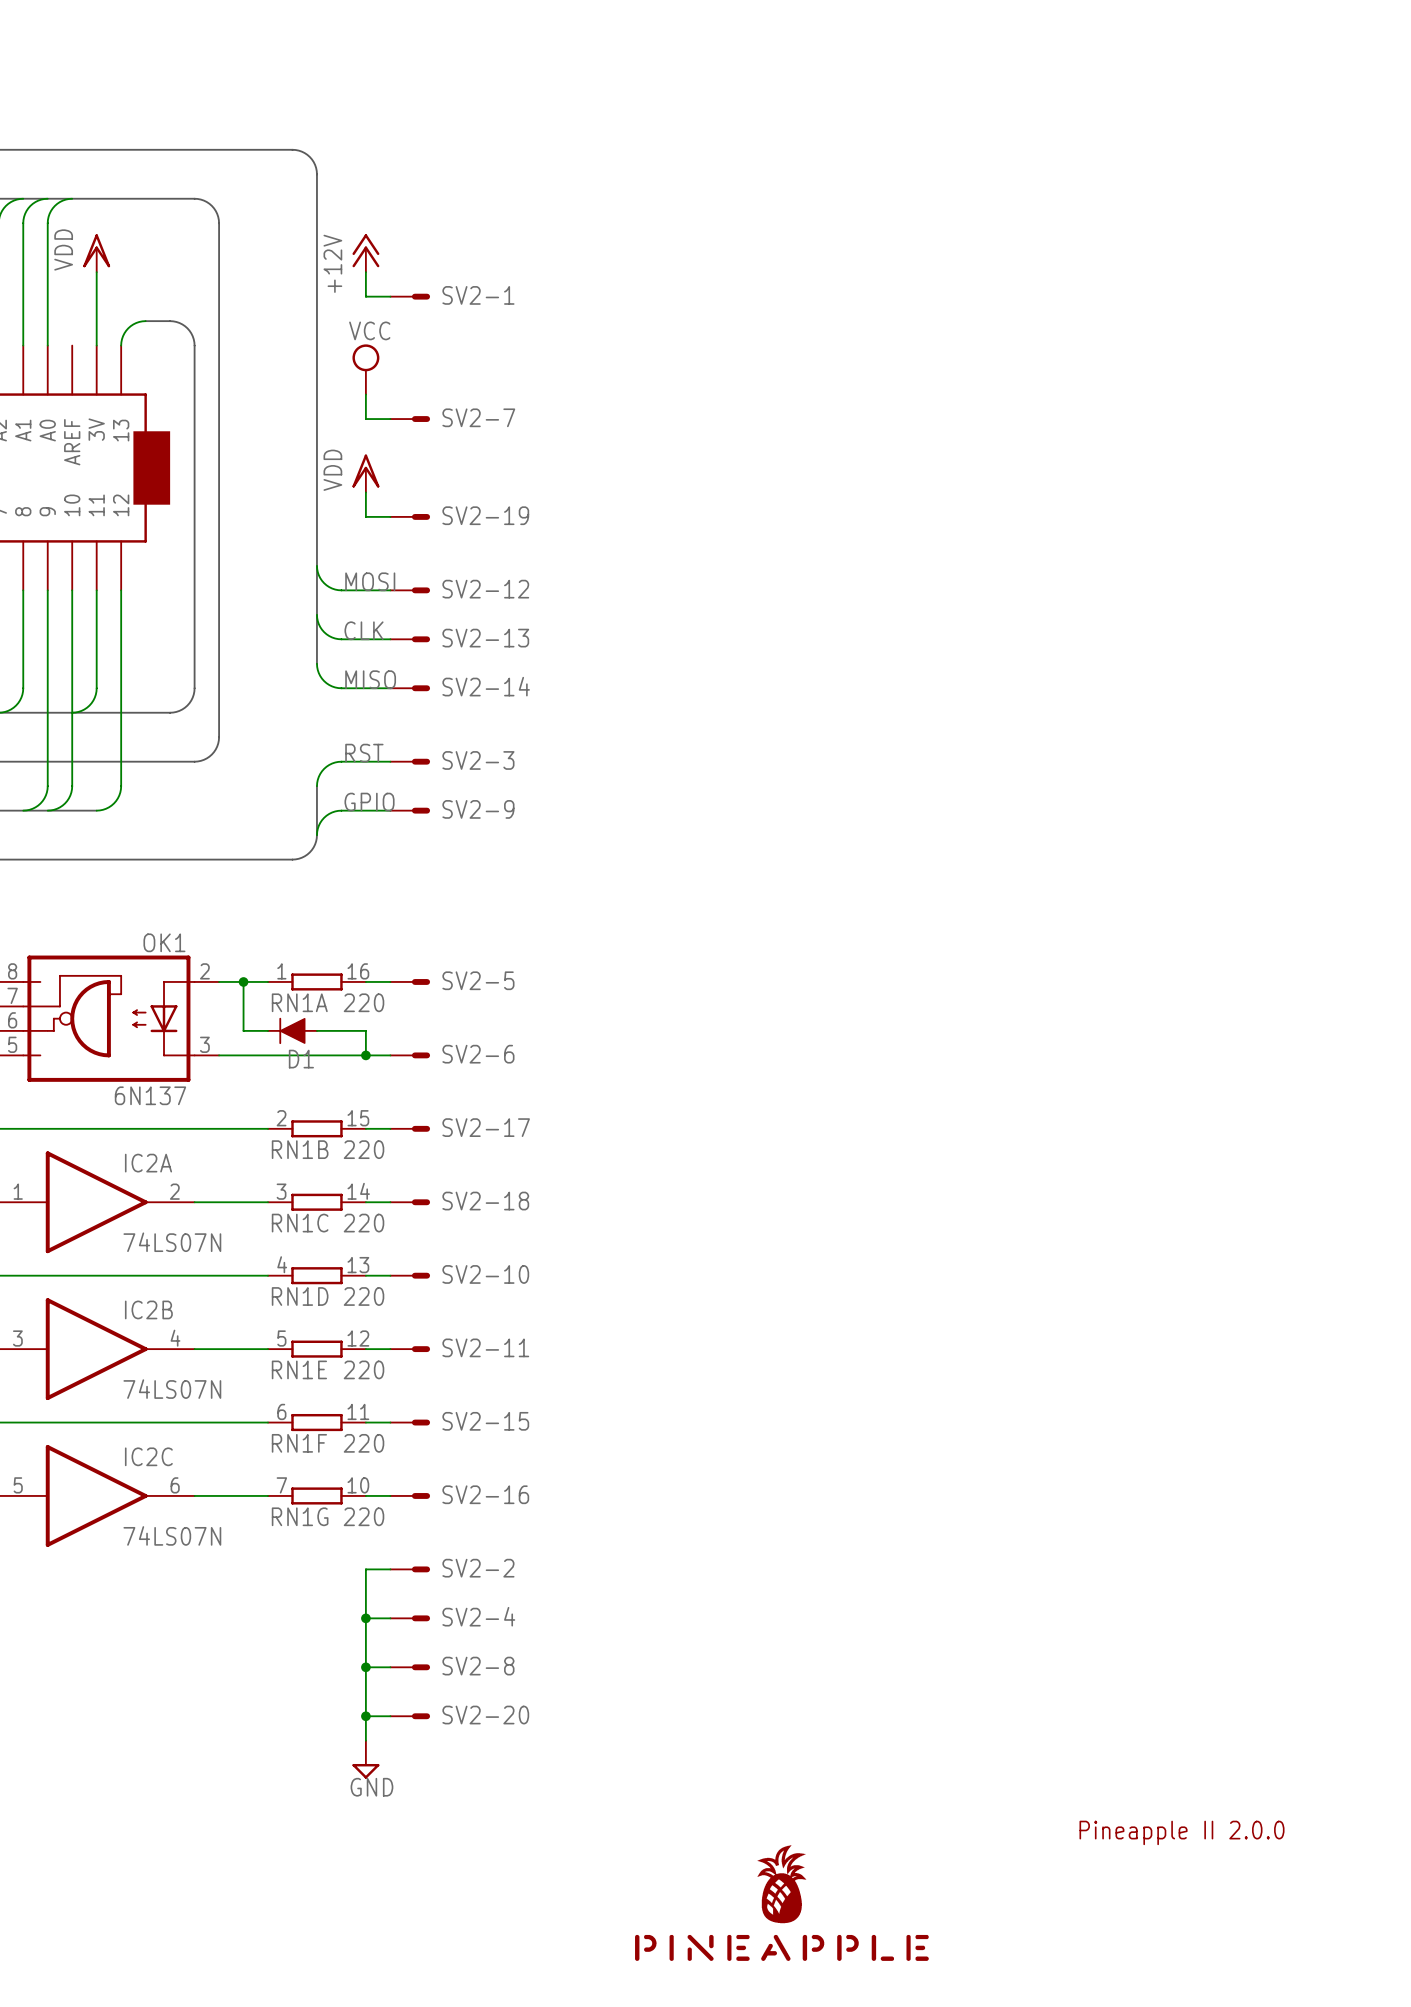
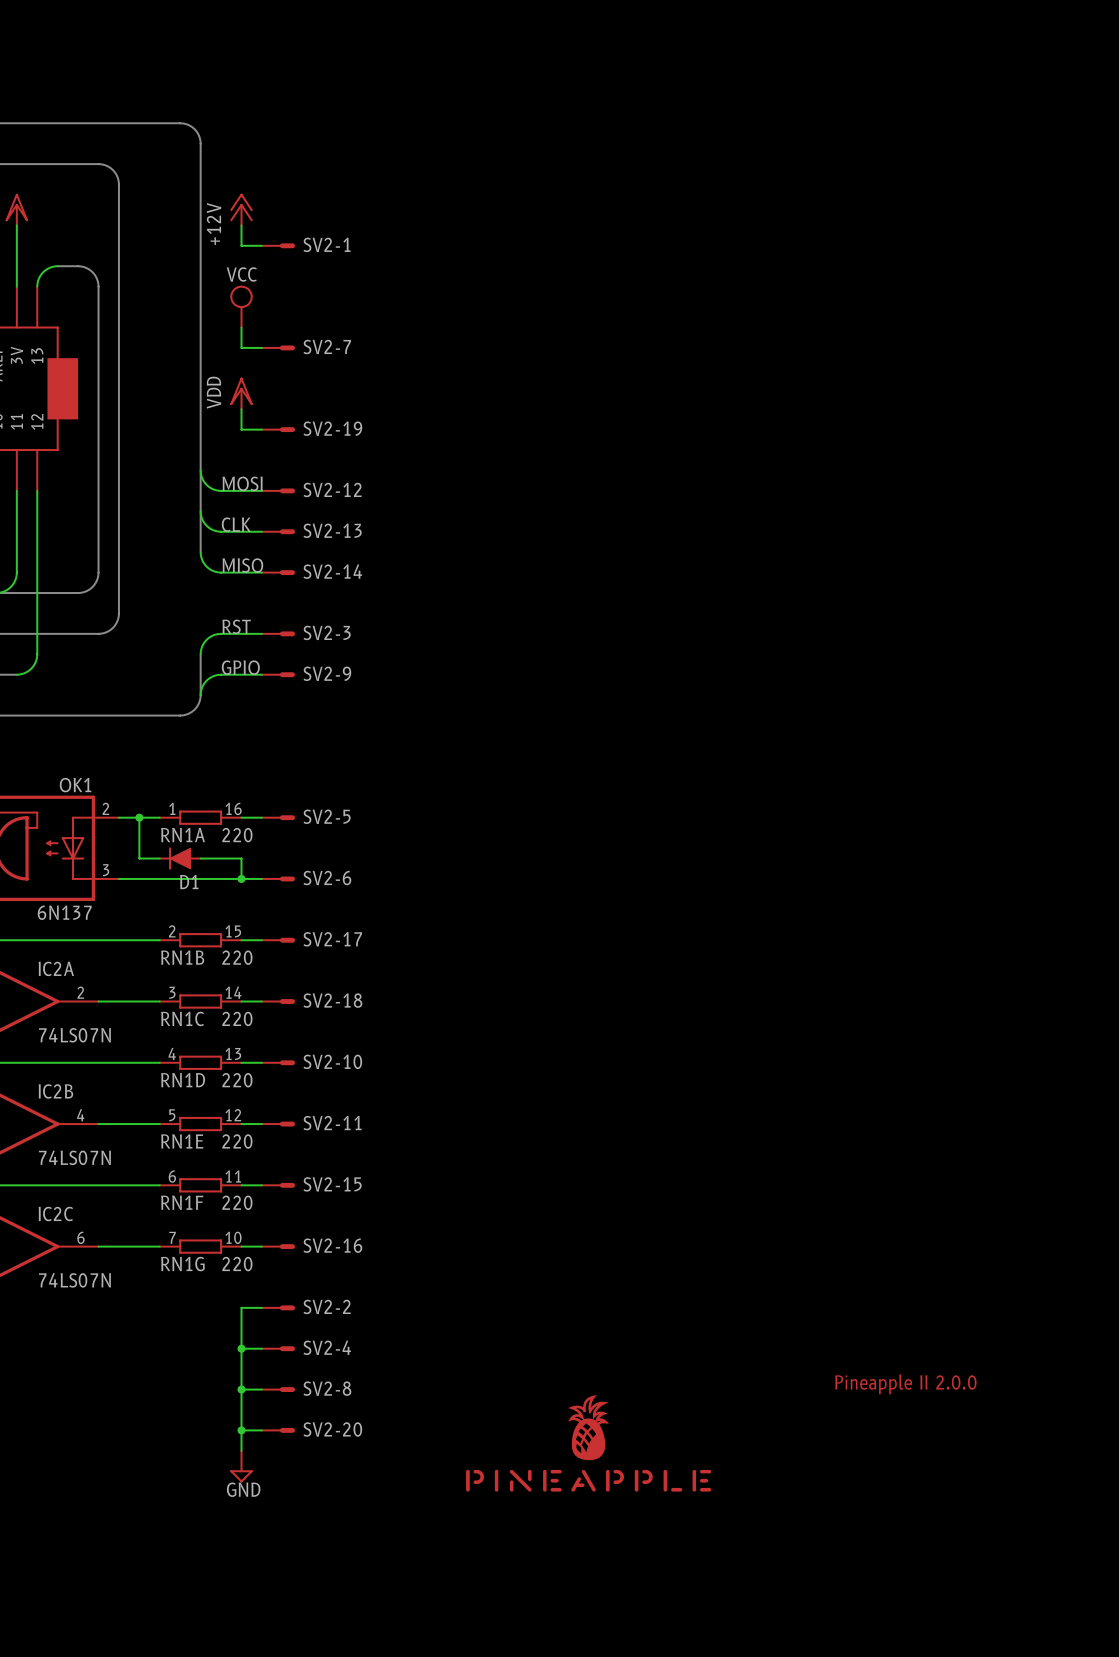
text position: Pineapple II 2.0.0 (1182, 1832) -> Pineapple II 2.0.0 (905, 1384)
part position: (781, 1903) -> (588, 1443)

